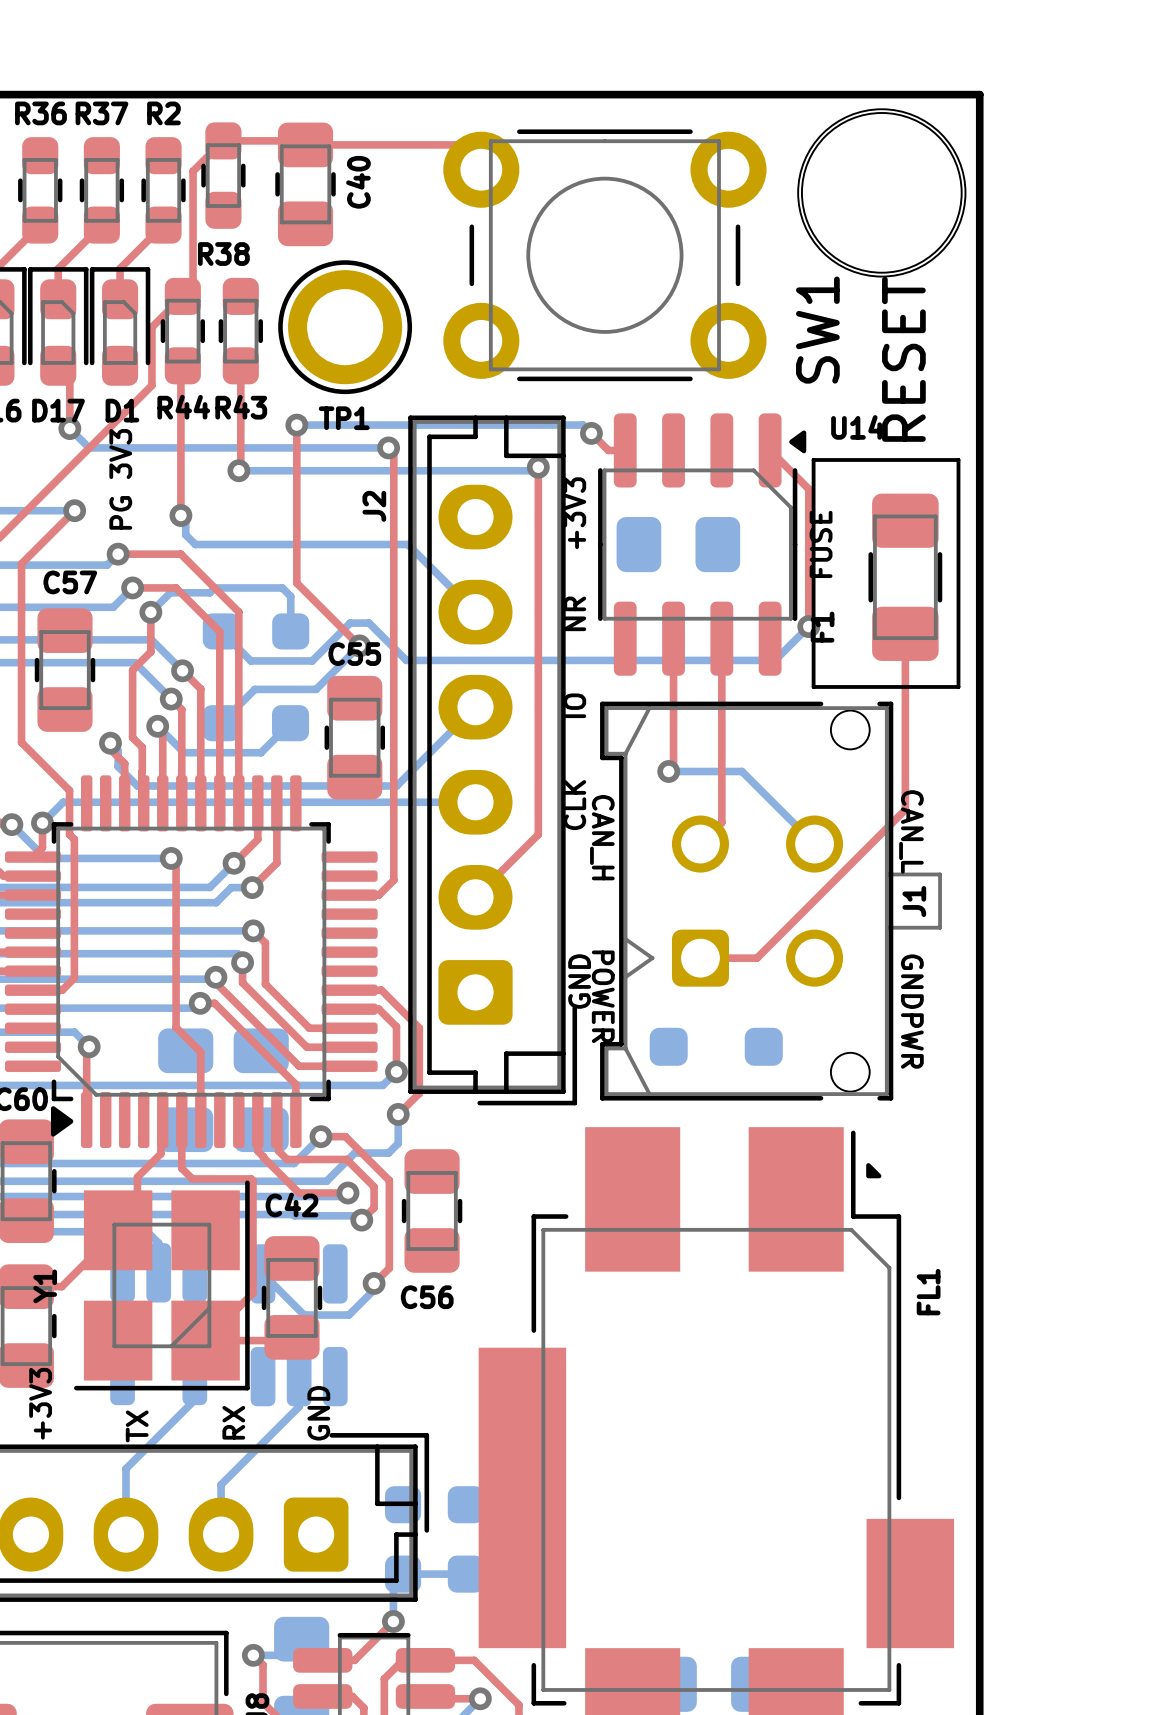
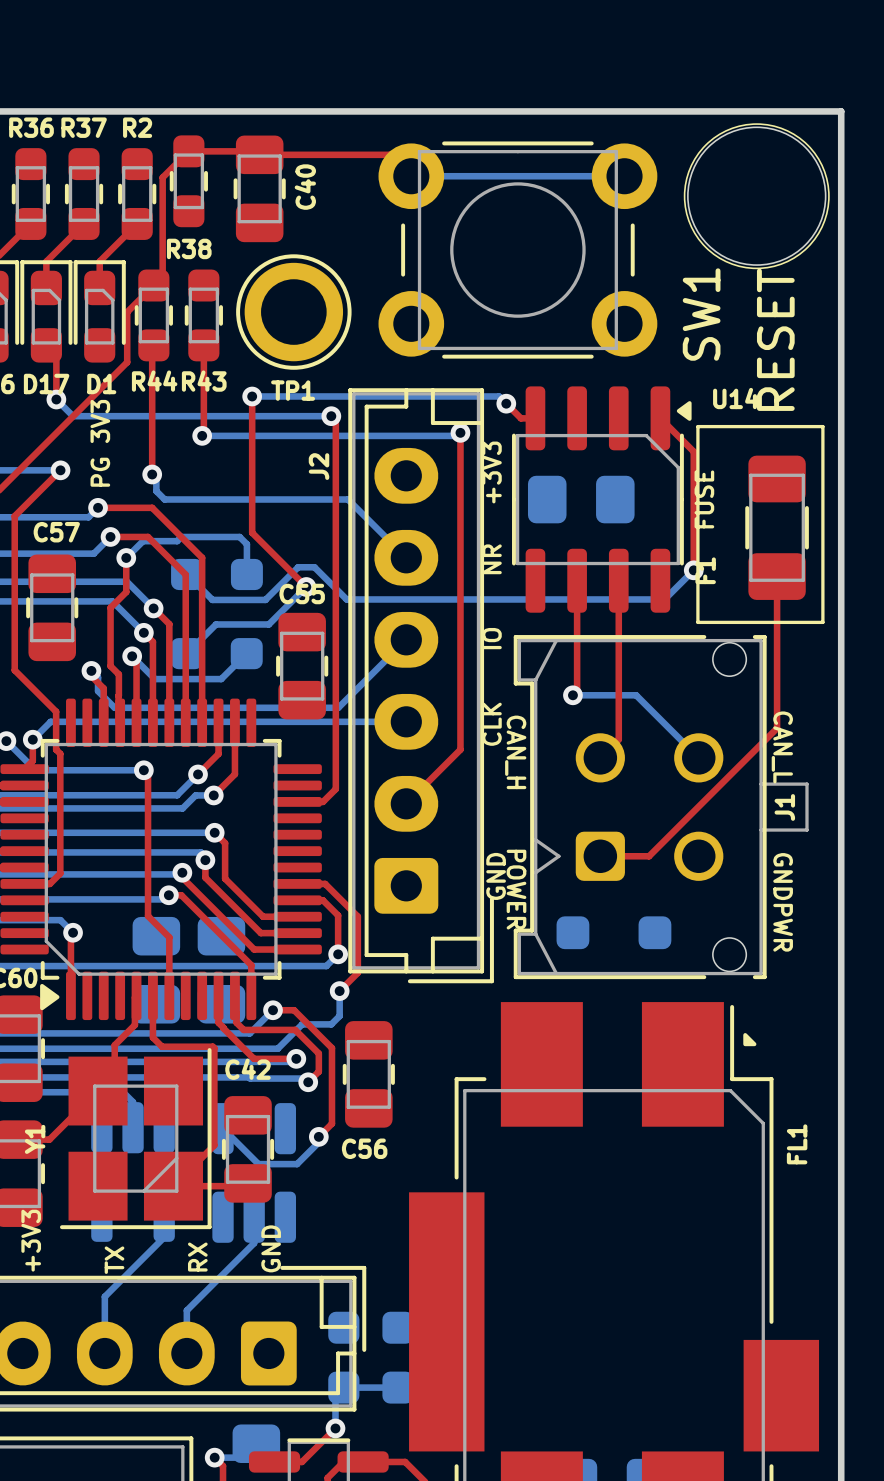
bottom track: none -> (411, 176) (624, 176)

